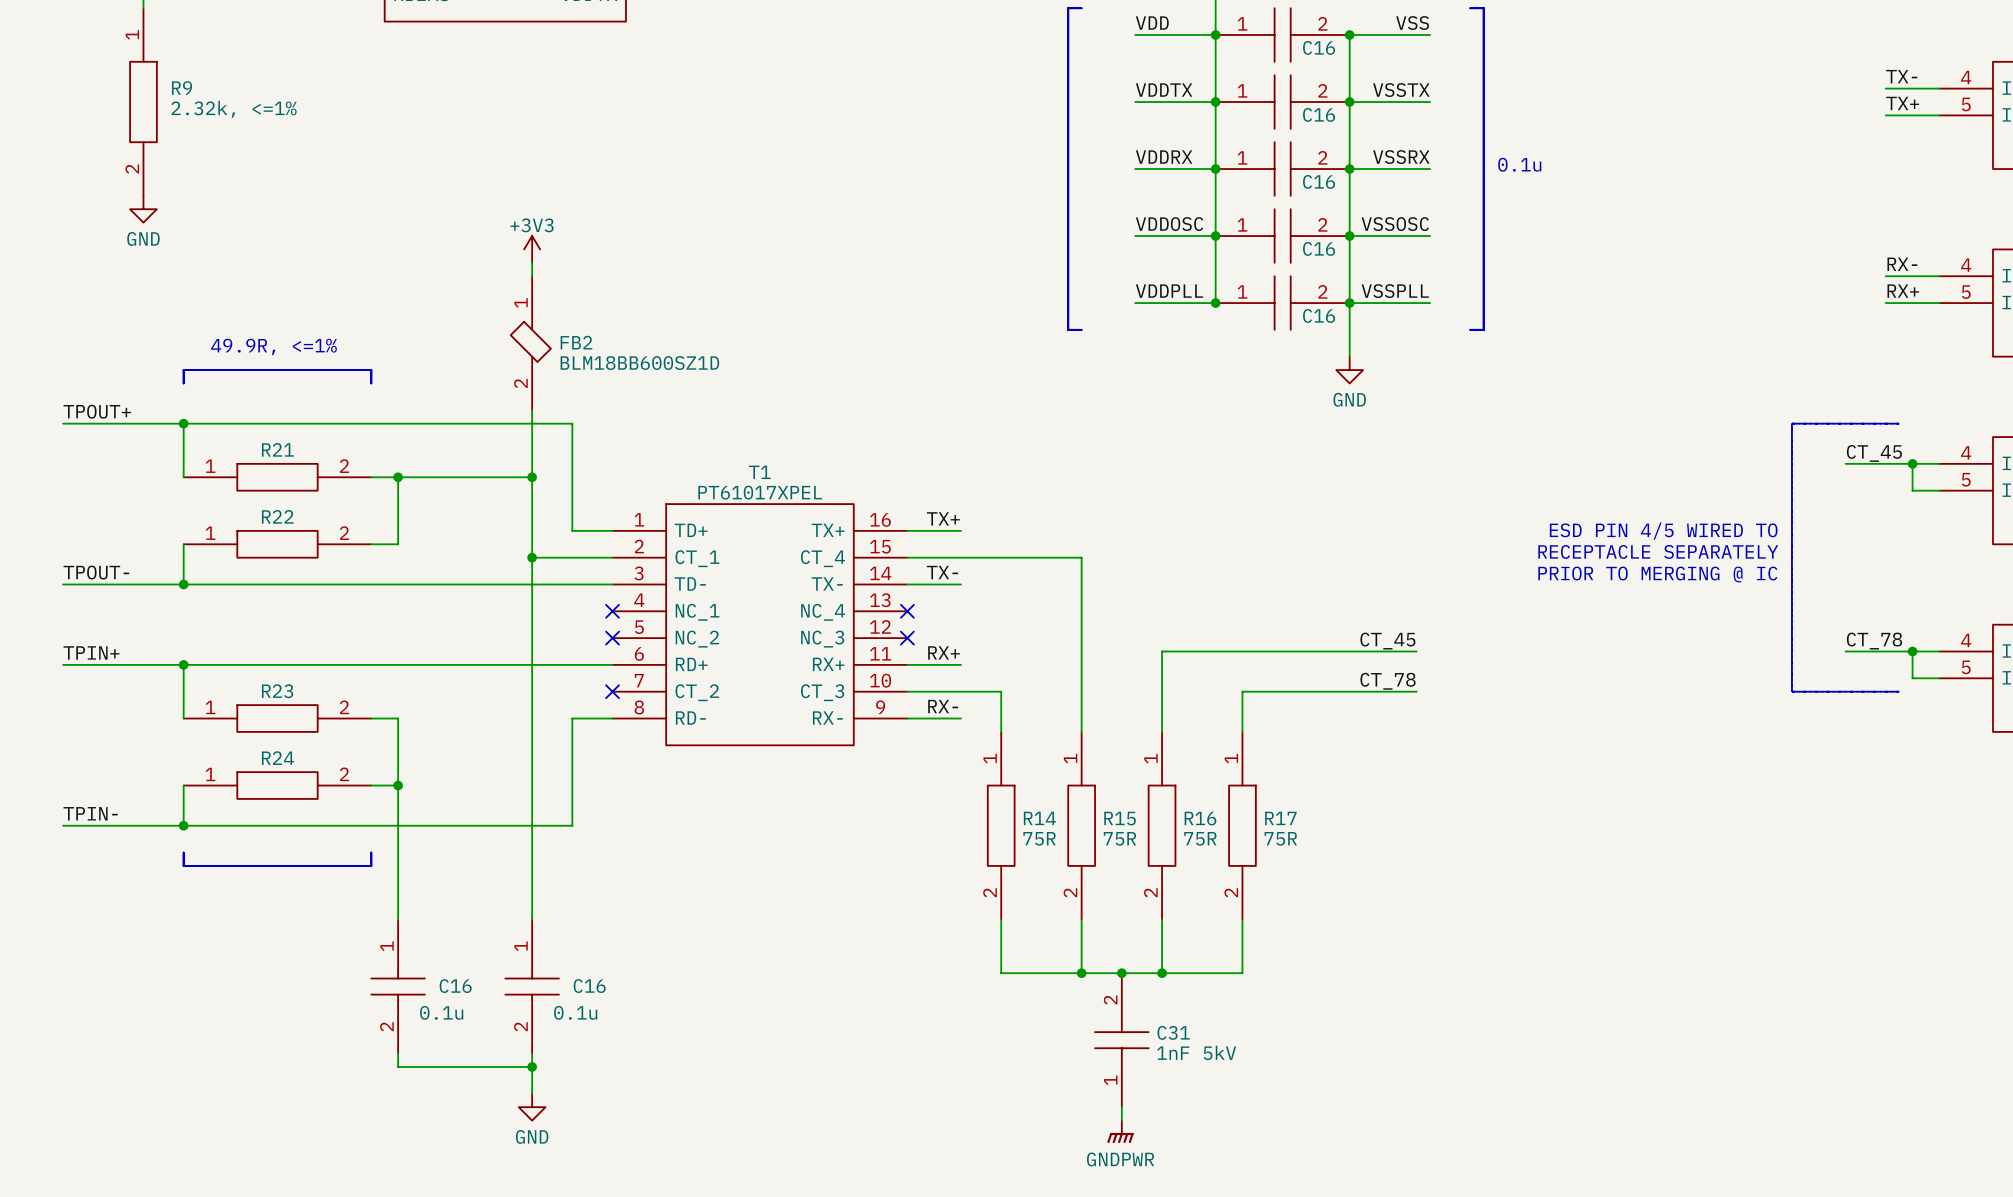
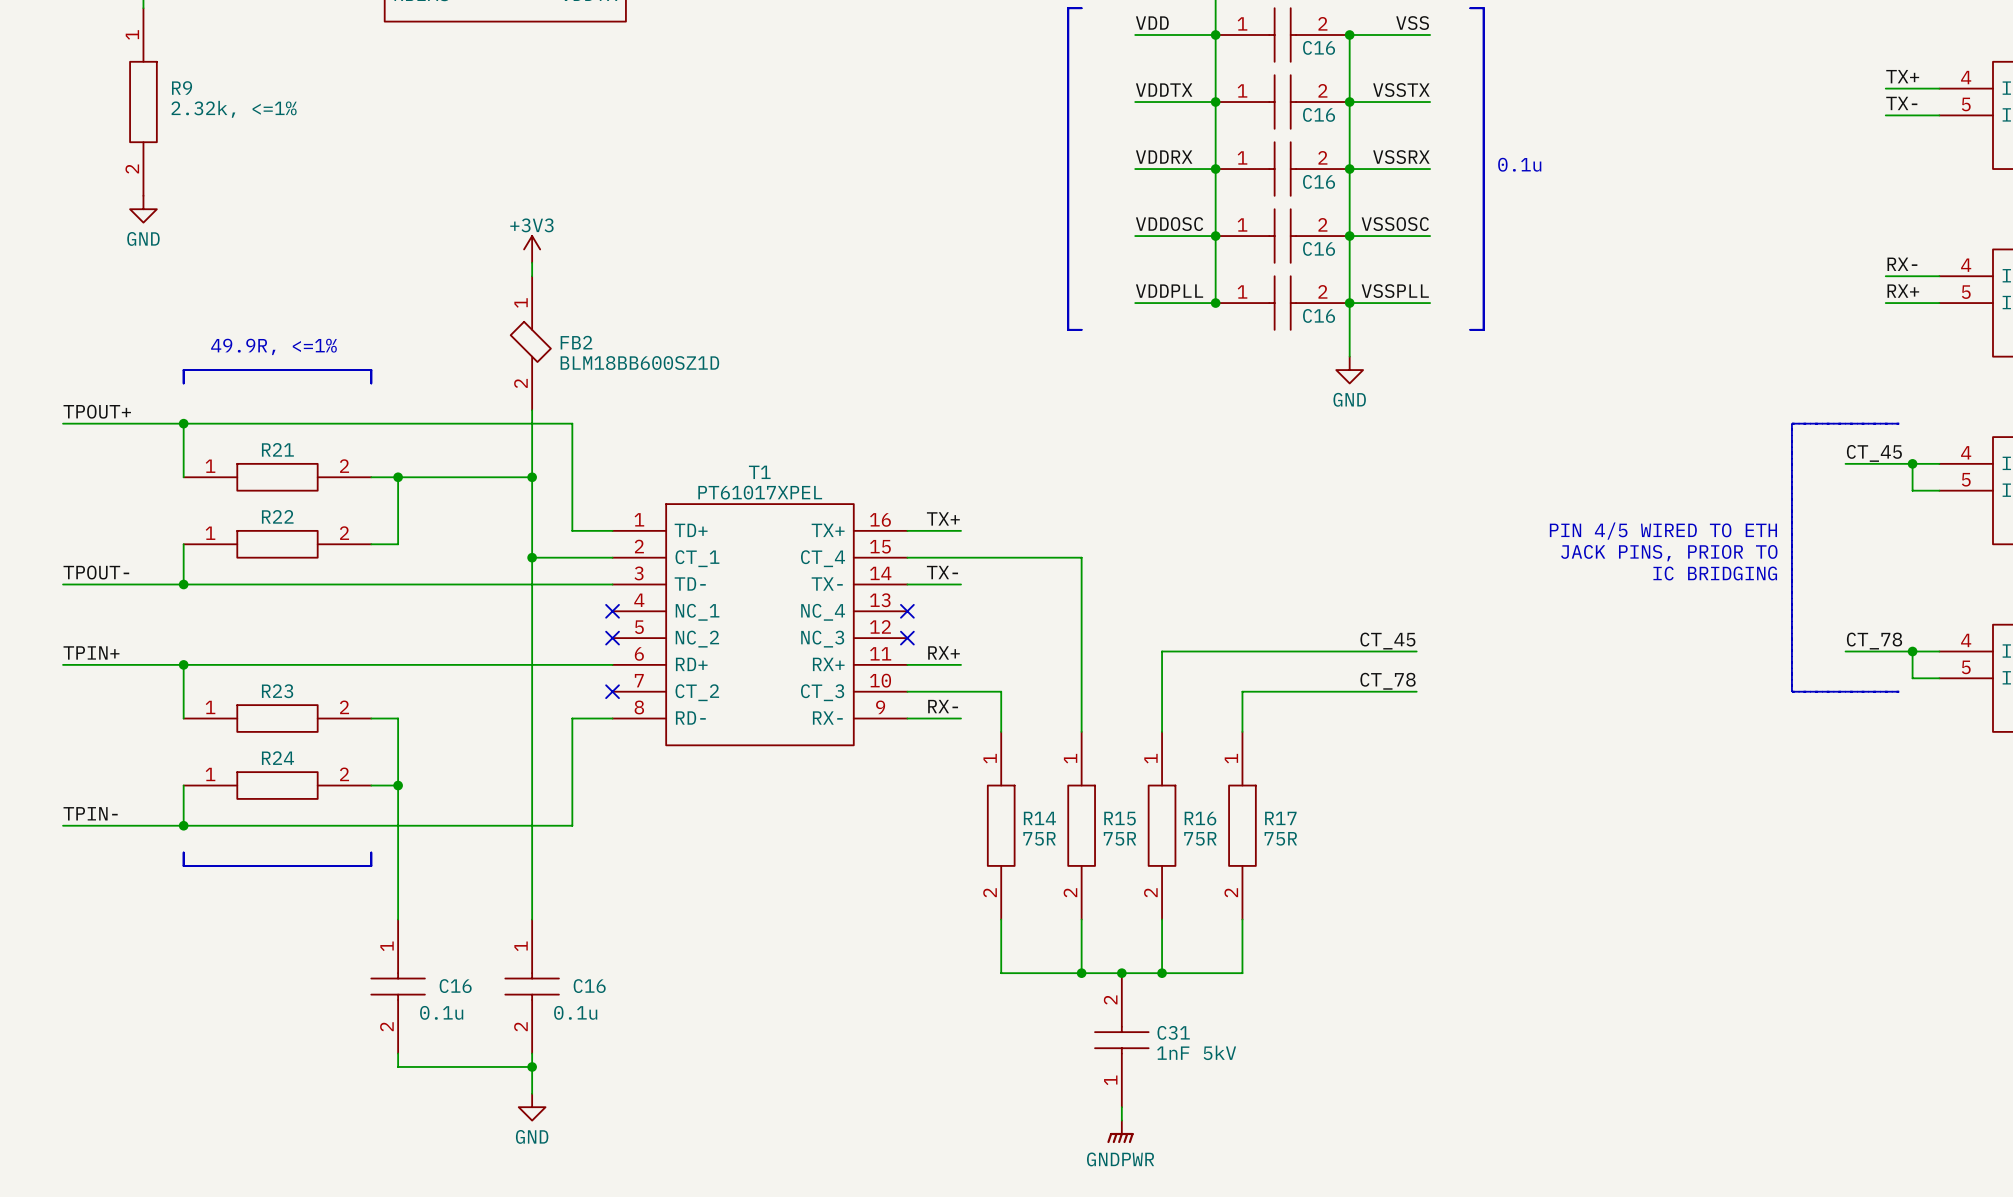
label: TX- (1901, 76) -> TX+ (1902, 76)
label: TX+ (1902, 103) -> TX- (1901, 103)
text: ESD PIN 4/5 WIRED TO (1663, 531) -> PIN 4/5 WIRED TO ETH (1663, 531)
text: RECEPTACLE SEPARATELY (1658, 551) -> JACK PINS, PRIOR TO (1669, 553)
text: PRIOR TO MERGING @ IC (1657, 574) -> IC BRIDGING (1715, 573)

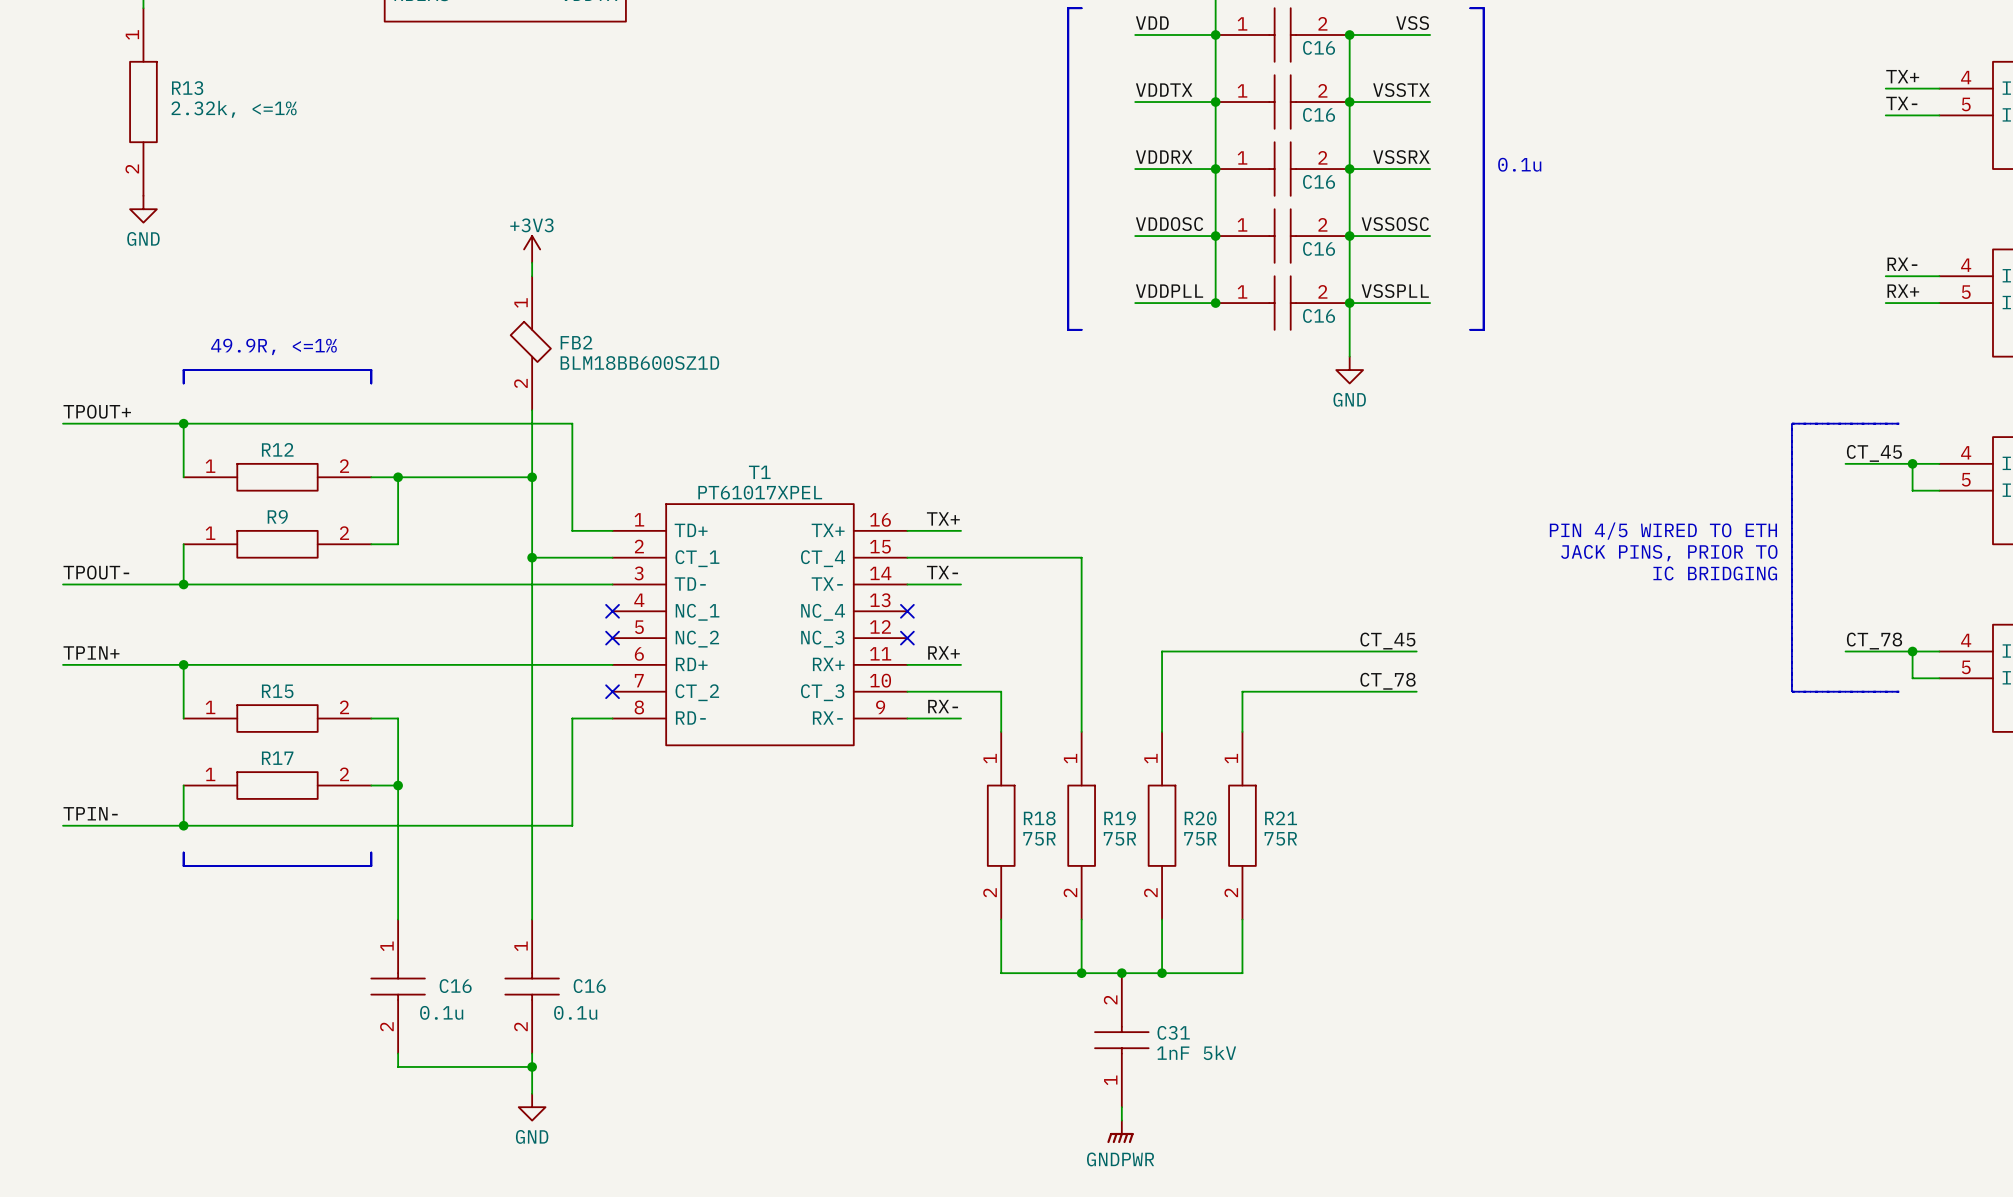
R9 name: R9 (182, 87) -> R13 (187, 88)
R21 name: R21 (277, 449) -> R12 (277, 449)
R22 name: R22 (277, 516) -> R9 (277, 516)
R23 name: R23 (277, 691) -> R15 (277, 691)
R24 name: R24 (277, 758) -> R17 (277, 758)
R14 name: R14 (1039, 818) -> R18 (1039, 818)
R15 name: R15 (1120, 818) -> R19 (1120, 818)
R16 name: R16 (1200, 818) -> R20 (1200, 818)
R17 name: R17 (1280, 818) -> R21 (1281, 818)

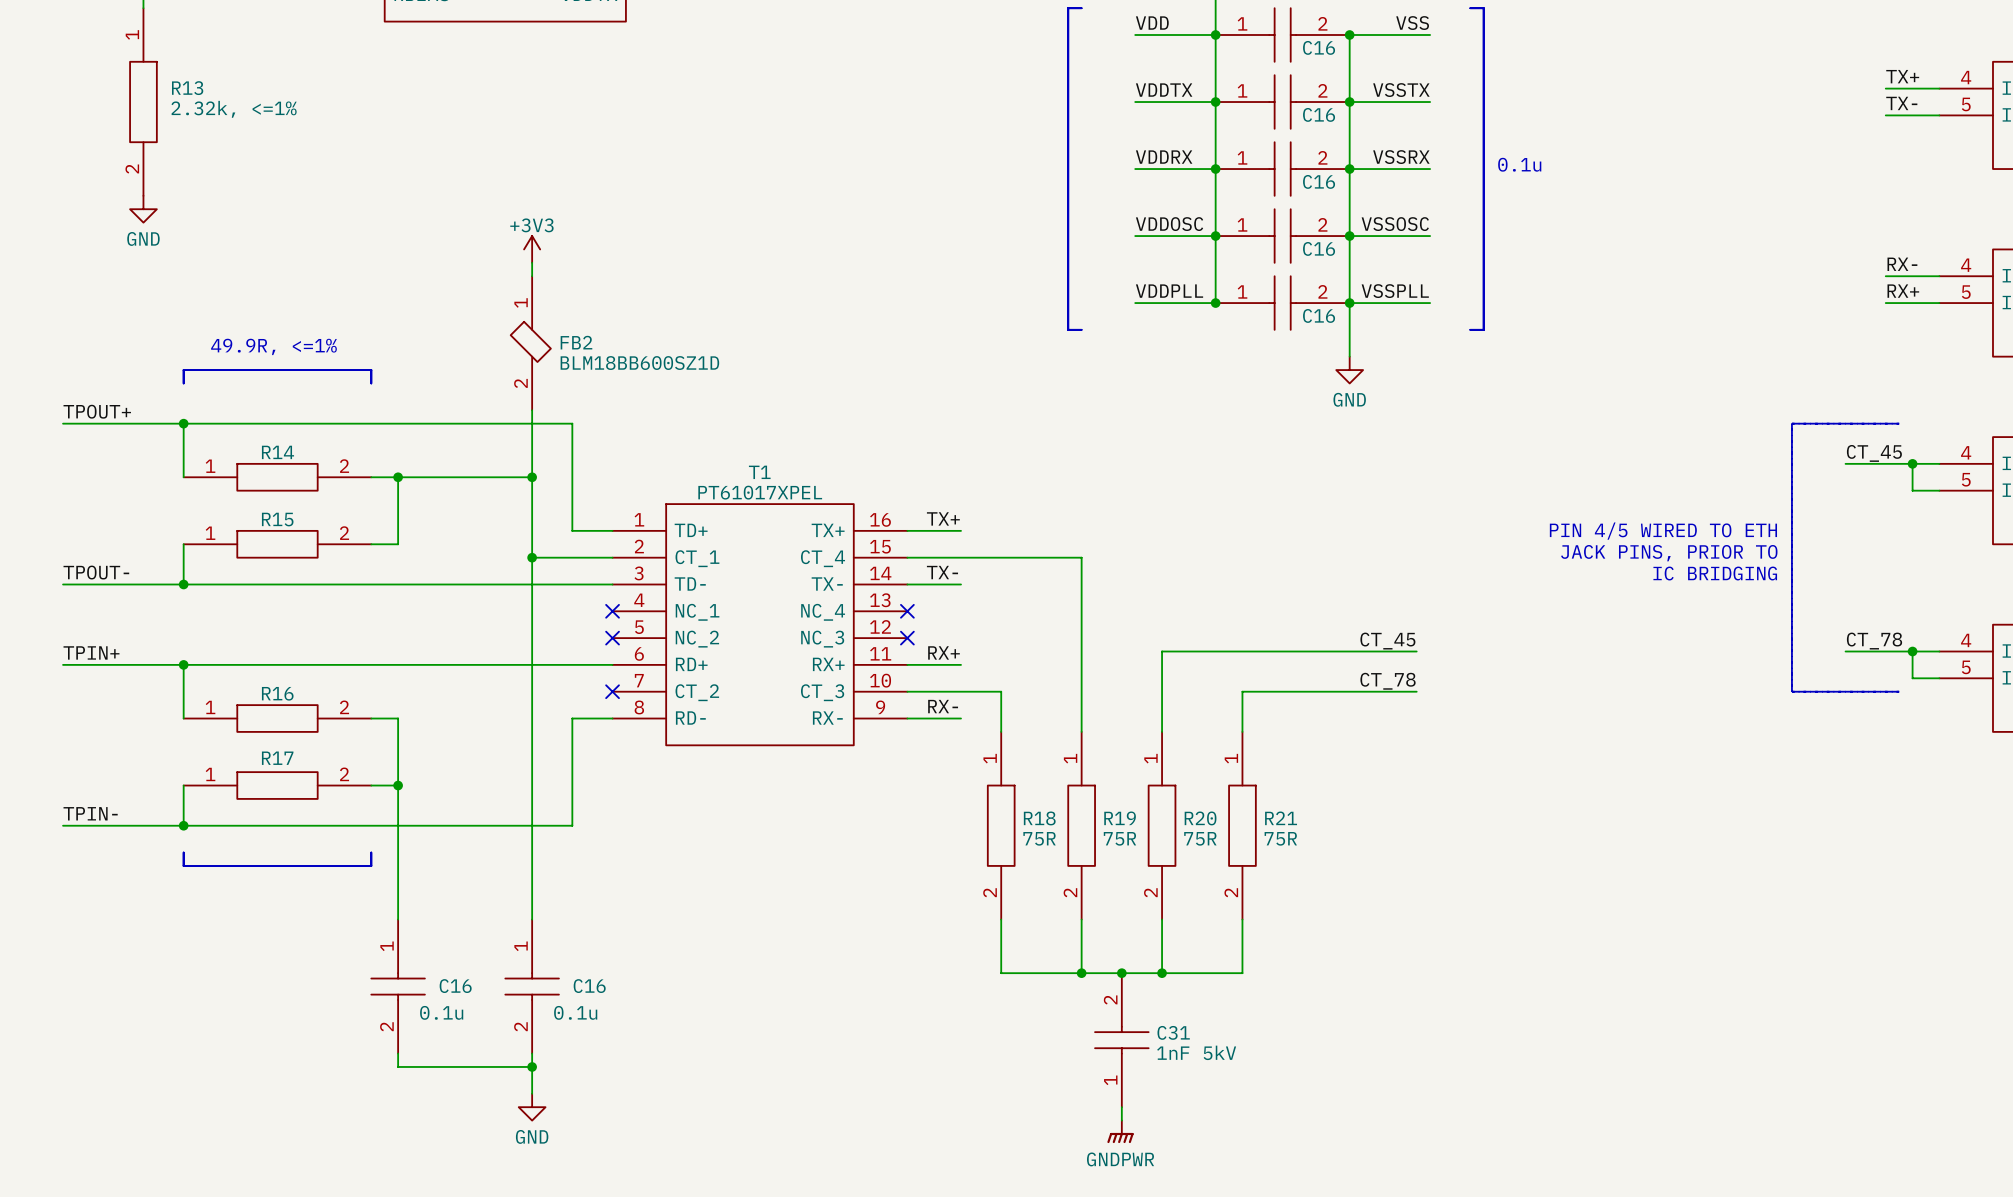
R12 name: R12 (277, 449) -> R14 (277, 452)
R9 name: R9 (277, 516) -> R15 (277, 519)
R15 name: R15 (277, 691) -> R16 (277, 693)

